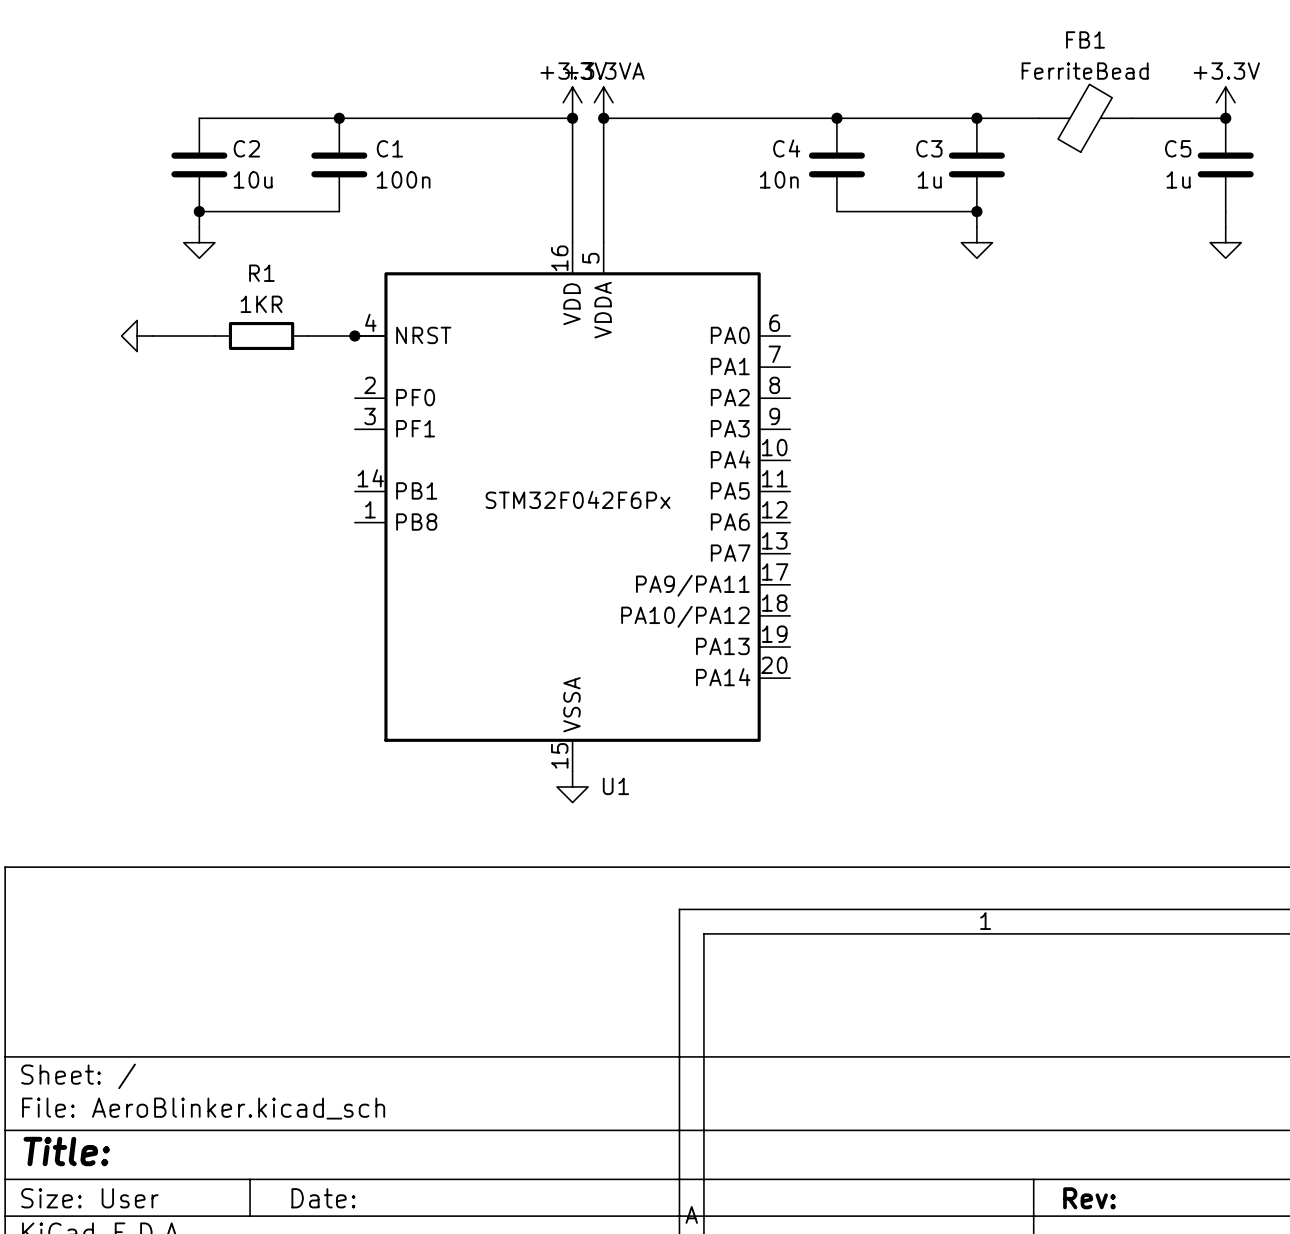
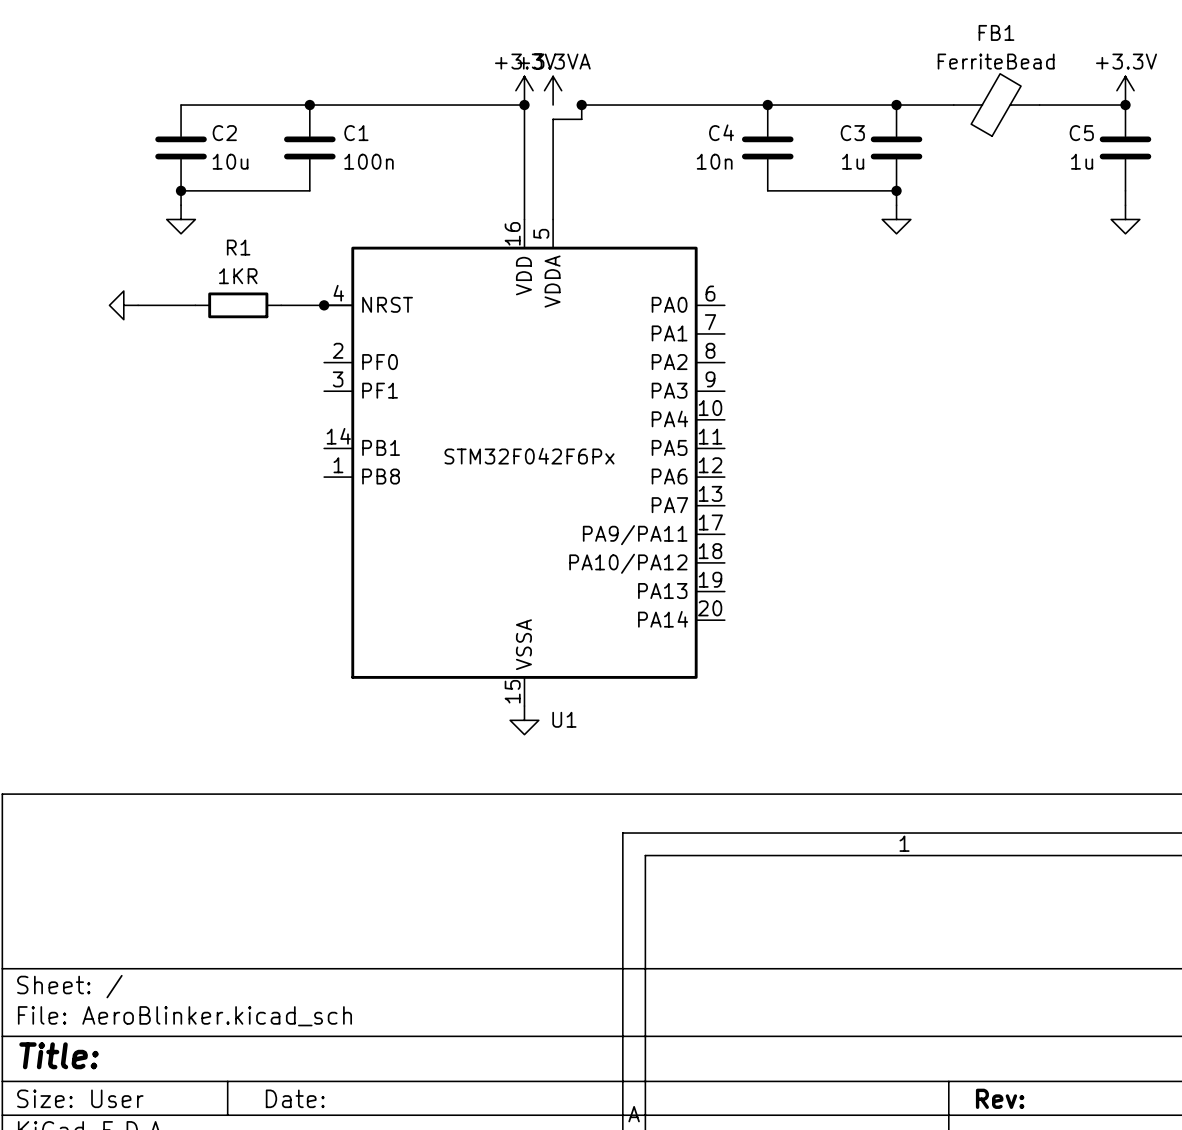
junction position: (603, 118) -> (581, 105)
wire: (634, 118) (603, 118) (603, 133) -> (581, 105) (581, 119) (553, 119)

